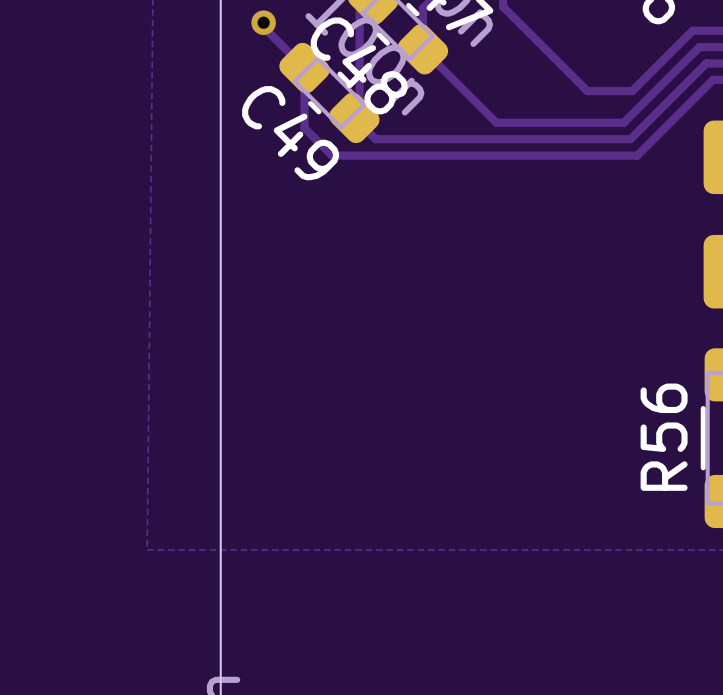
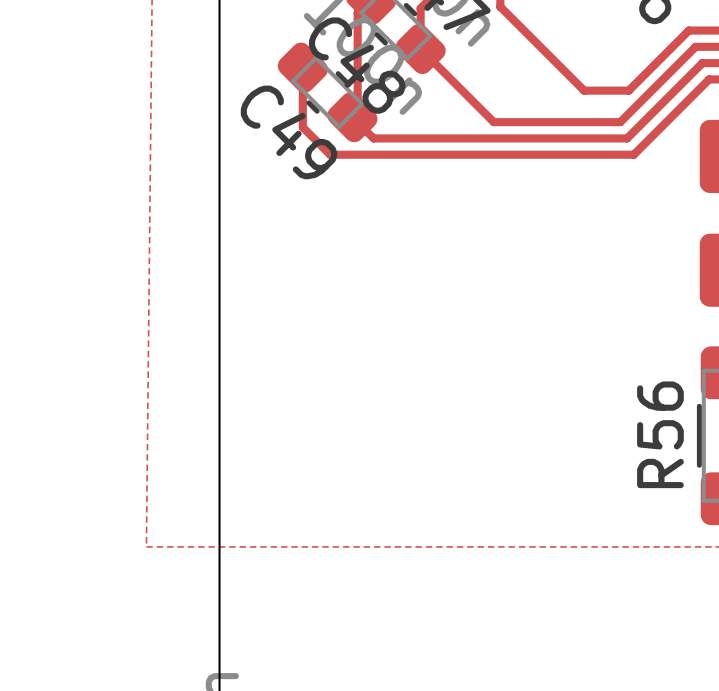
track: (263, 22) (263, 27) (304, 68) -> none
via: (263, 22) -> none

